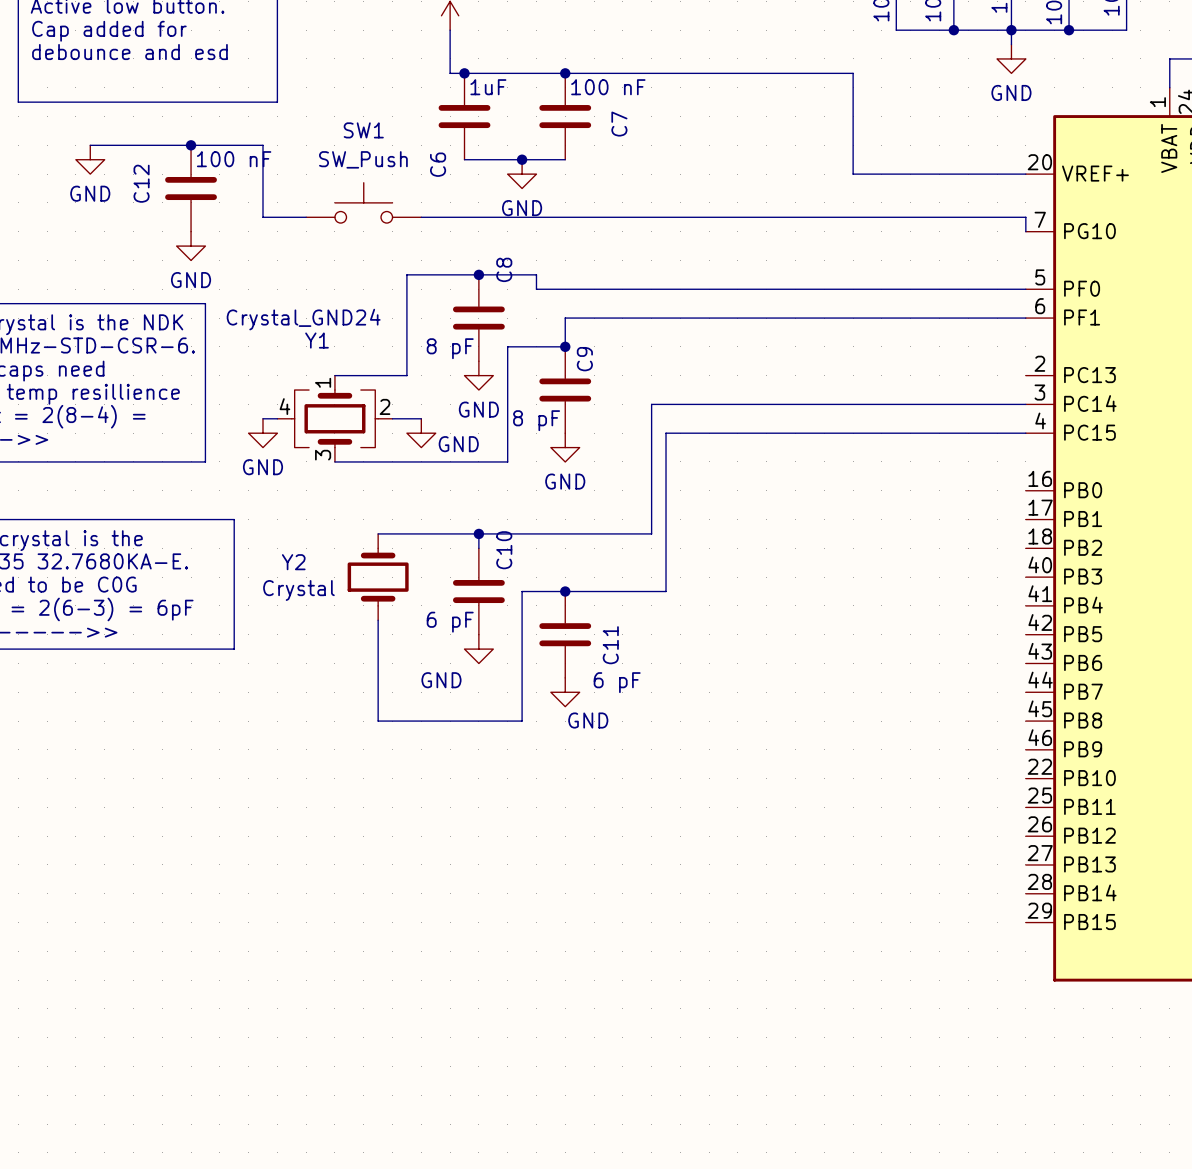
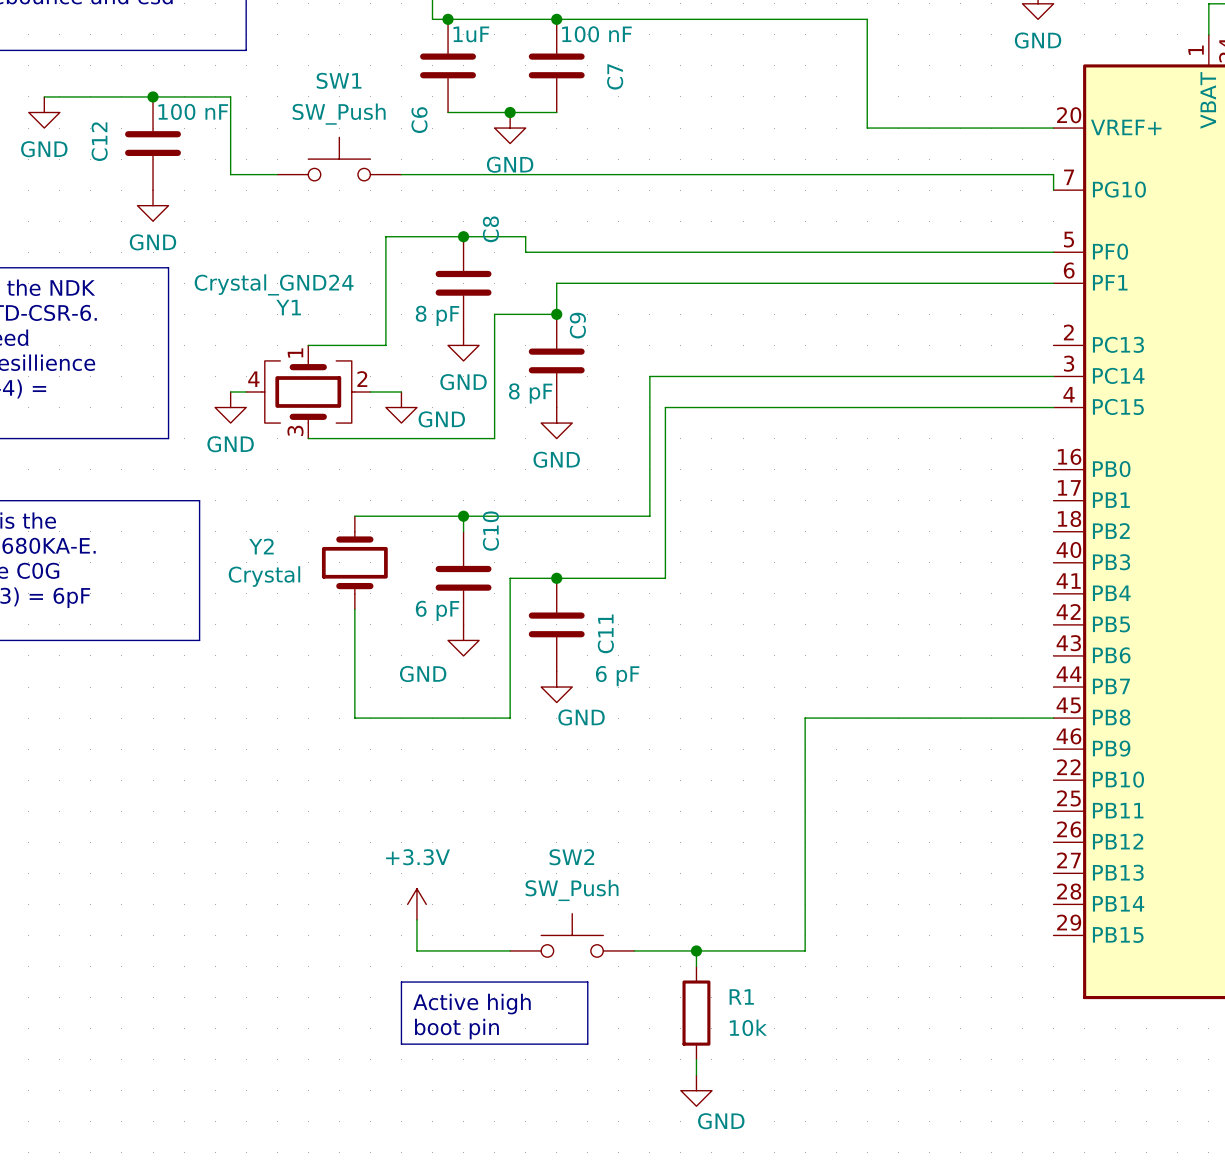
wire: none -> (1053, 718) (805, 718) (805, 950) (634, 950)
power symbol: none -> +3.3V (416, 904)
wire: none -> (416, 919) (416, 950) (510, 950)
SW2: none -> SW_Push (572, 935)
wire: none -> (696, 950) (696, 966)
junction: none -> (696, 950)
line: none -> (401, 982) (587, 982) (587, 1044) (401, 1044) (401, 982)
text: none -> Active high (471, 1004)
R1: none -> 10k (696, 1013)
text: none -> boot pin (456, 1029)
wire: none -> (696, 1059) (696, 1075)
power symbol: none -> GND (696, 1090)

